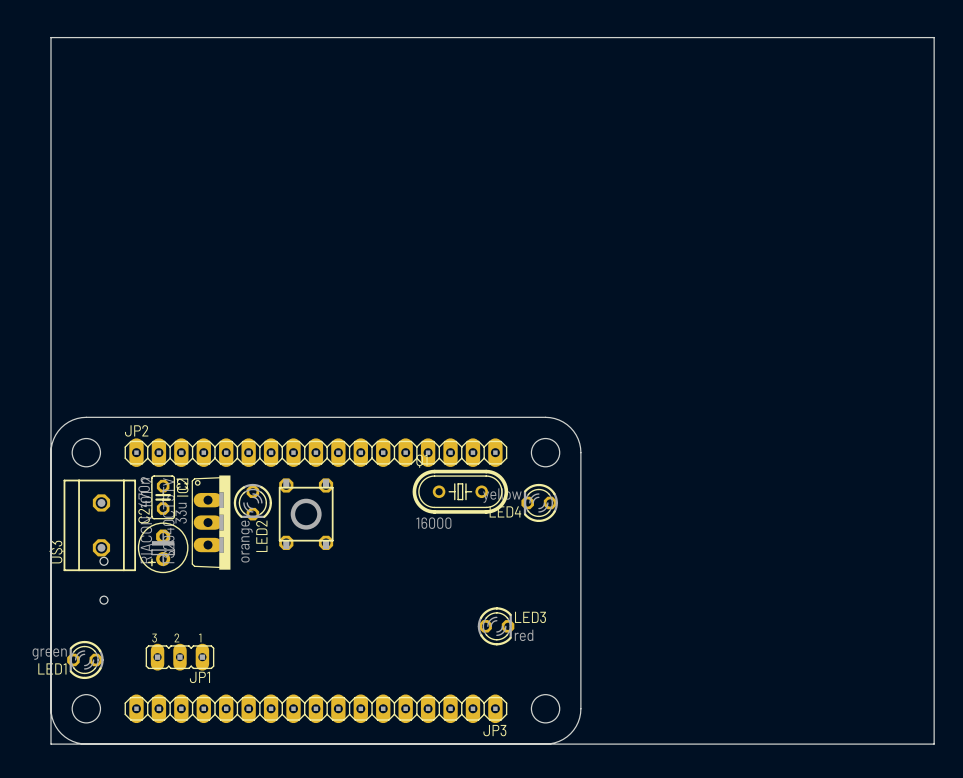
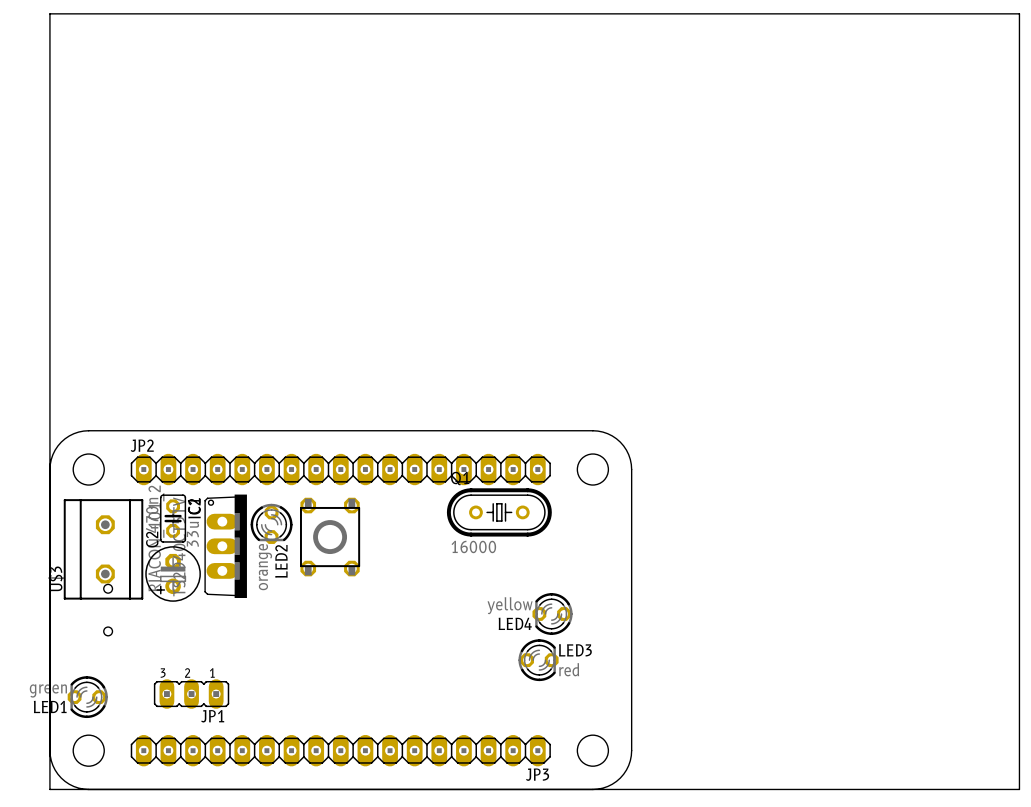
LED4 position: (539, 502) -> (552, 614)

